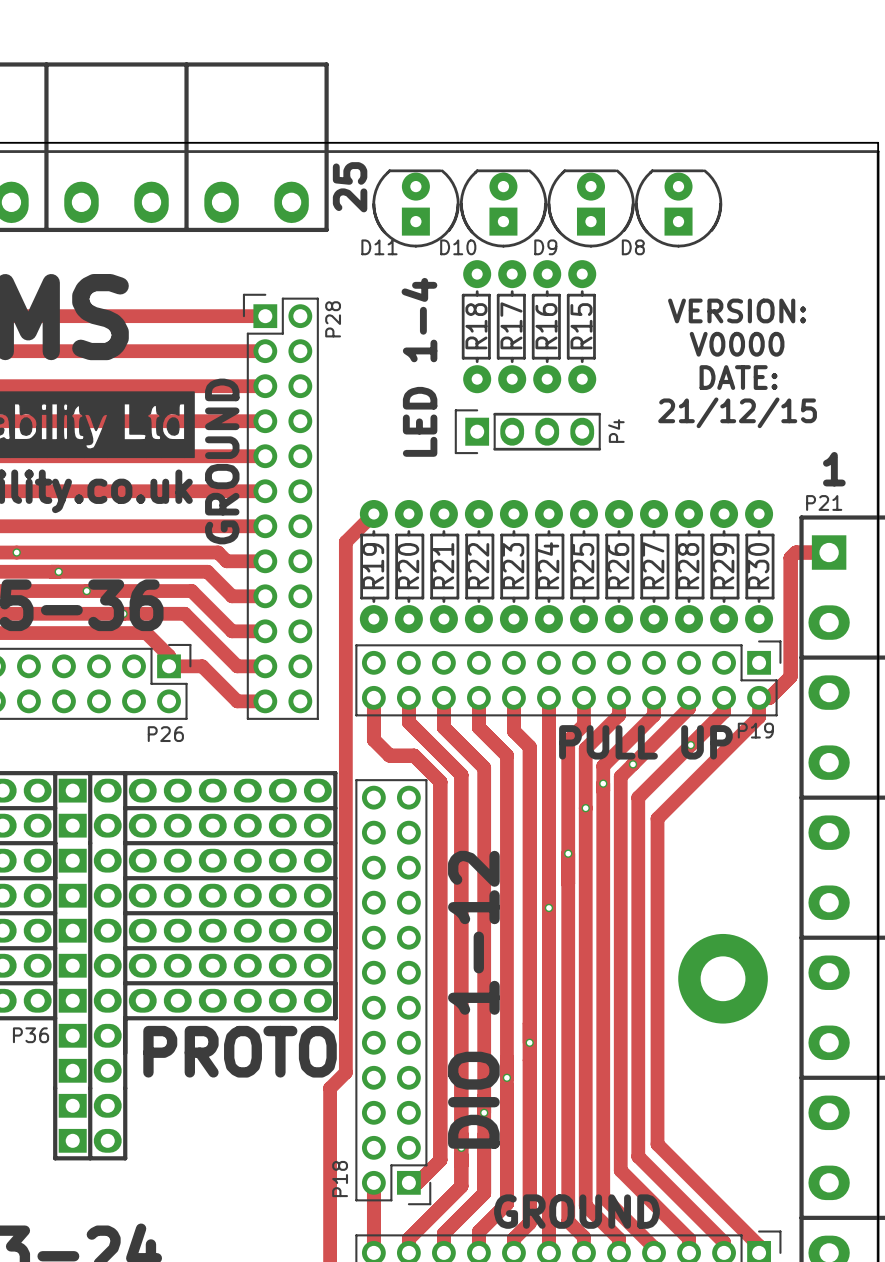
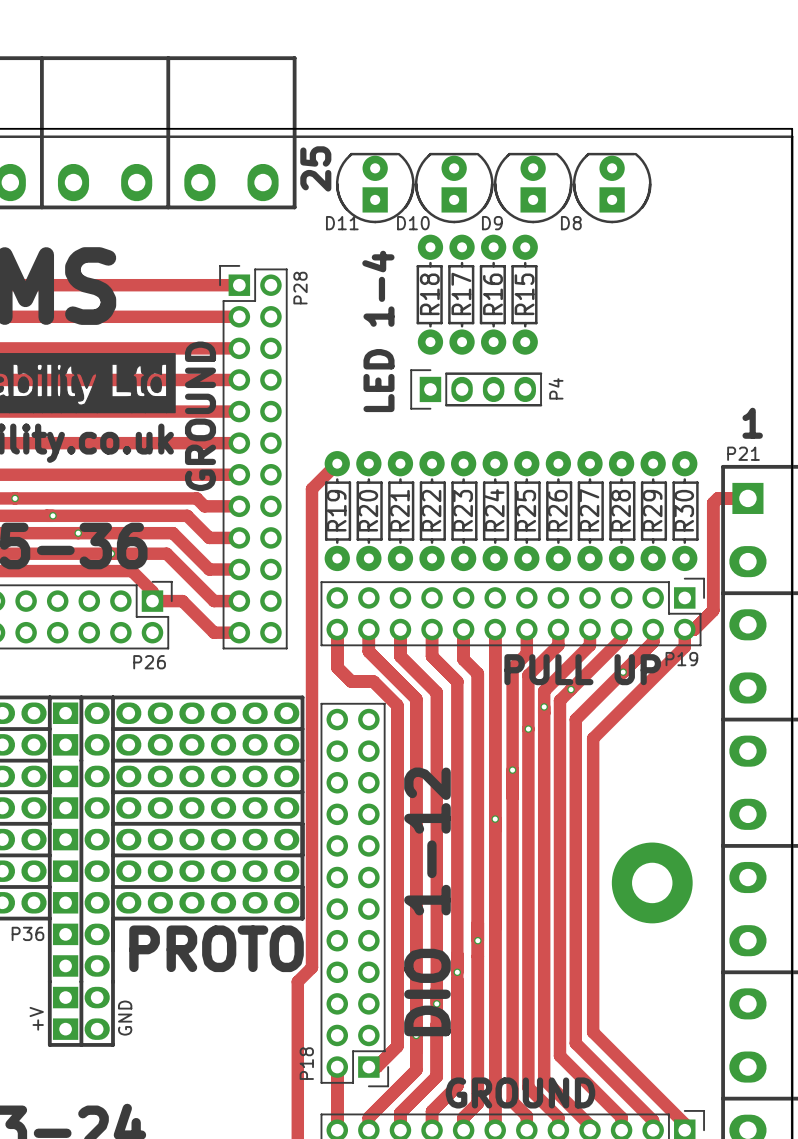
text: VERSION: (737, 310) -> none
text: V0000 (737, 344) -> none
text: DATE: (738, 377) -> none
text: 21/12/15 (737, 412) -> none
P36 text: none -> GND (125, 1018)
P36 text: none -> +V (36, 1018)

